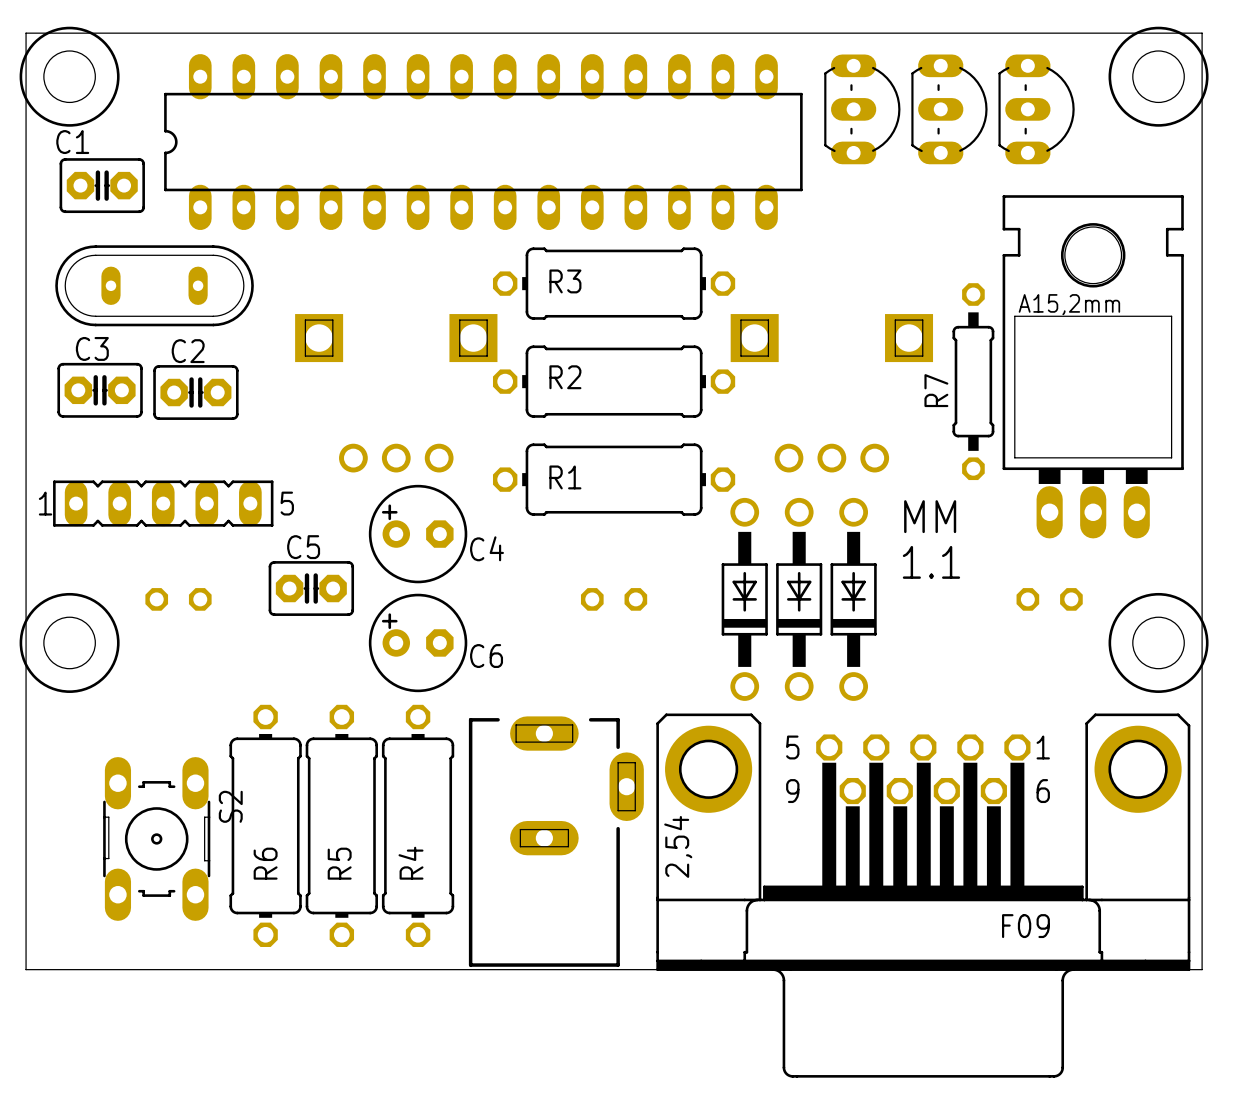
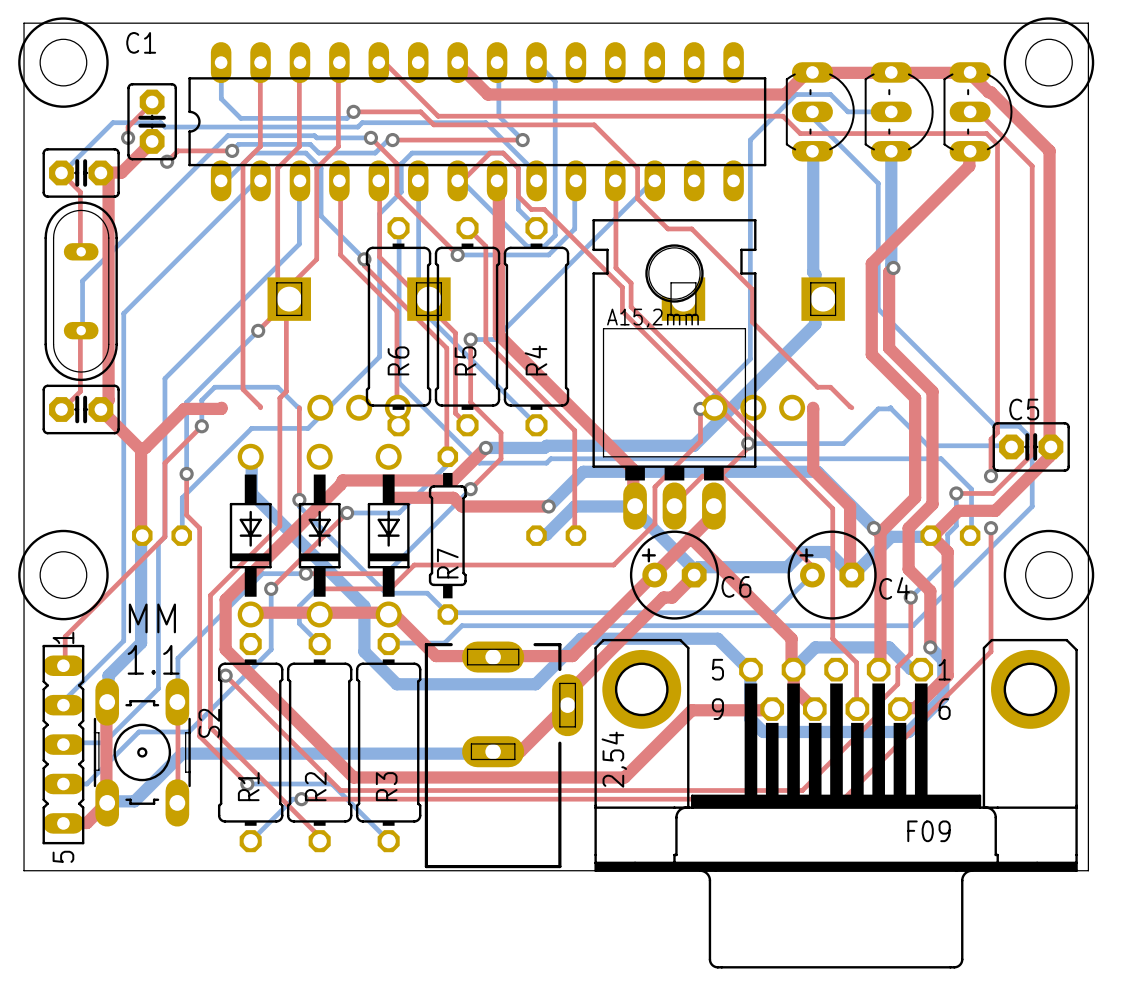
bottom track: none -> (221, 62) (221, 98) (240, 118) (347, 118) (353, 111)
top track: none -> (260, 62) (260, 146) (243, 163) (243, 389) (260, 407)
top track: none -> (299, 62) (299, 146) (277, 168) (277, 311) (258, 330)
top track: none -> (339, 62) (338, 146) (316, 168) (316, 259) (286, 289) (286, 391) (279, 398) (279, 525) (210, 595) (210, 727) (318, 836) (319, 841)
top track: none -> (378, 62) (386, 64) (438, 116) (782, 116) (800, 133) (986, 133) (997, 144) (997, 432) (991, 439) (991, 476)
top track: none -> (457, 62) (488, 94) (785, 94) (806, 72) (970, 72) (1049, 150) (1049, 456) (995, 510) (958, 510) (936, 532) (930, 535) (947, 552) (947, 675) (915, 708) (899, 709)
bottom track: none -> (497, 62) (498, 64) (498, 116) (522, 140)
bottom track: none -> (536, 62) (555, 81) (555, 235) (544, 246) (527, 246) (461, 181) (457, 180)
part: (862, 109) -> none
part: (949, 109) -> none
part: (1036, 109) -> none
top track: none -> (152, 102) (128, 127) (128, 137)
top track: none -> (353, 111) (420, 111) (433, 124) (594, 124) (637, 168) (637, 198) (667, 228) (691, 228) (752, 289) (752, 322) (817, 387) (830, 387) (851, 407)
via: none -> (353, 111)
bottom track: none -> (812, 111) (813, 118) (878, 183) (878, 309) (995, 426) (1019, 426) (1032, 439) (1032, 506) (912, 625) (461, 625) (444, 643) (388, 644)
part: none -> (820, 111)
bottom track: none -> (891, 111) (847, 111) (830, 94) (795, 94) (750, 140) (750, 359) (700, 408)
part: none -> (899, 111)
top track: none -> (970, 111) (978, 111) (1032, 166) (1032, 454) (993, 493) (956, 493)
part: none -> (978, 111)
C1 name position: C1 (72, 142) -> C1 (141, 42)
part position: (483, 142) -> (477, 121)
via: none -> (128, 137)
top track: none -> (370, 137) (396, 163) (396, 194) (457, 254)
bottom track: none -> (370, 137) (227, 135) (82, 280) (81, 330)
via: none -> (370, 137)
top track: none -> (392, 140) (522, 140)
bottom track: none -> (392, 140) (388, 140) (375, 153) (318, 153) (310, 144) (238, 144) (232, 150)
via: none -> (392, 140)
via: none -> (522, 140)
top track: none -> (152, 141) (121, 172) (100, 172) (108, 176) (108, 400) (100, 409) (141, 450)
top track: none -> (232, 150) (177, 150) (167, 161)
via: none -> (232, 150)
bottom track: none -> (812, 151) (815, 324) (693, 445) (546, 445) (544, 447) (485, 447)
bottom track: none -> (891, 151) (891, 265) (893, 267)
top track: none -> (970, 151) (969, 166) (871, 263) (871, 354) (915, 398) (915, 497) (880, 532)
C1 rotation: 0° (102, 185) -> 90° clockwise (152, 121)
C1 position: (102, 185) -> (152, 121)
via: none -> (167, 161)
top track: none -> (61, 172) (80, 192) (81, 251)
bottom track: none -> (61, 172) (112, 122) (160, 122) (164, 127) (357, 127) (362, 122) (485, 122) (535, 172) (536, 180)
part: none -> (81, 172)
bottom track: none -> (221, 180) (221, 179) (227, 179) (253, 153) (305, 153) (321, 168) (321, 215) (364, 259)
bottom track: none -> (260, 180) (256, 181) (123, 313) (123, 640) (65, 699) (63, 705)
bottom track: none -> (299, 180) (299, 244) (164, 378) (164, 536) (158, 543) (158, 688) (104, 742) (65, 742) (63, 744)
top track: none -> (339, 180) (340, 254) (396, 311) (396, 424) (398, 425)
top track: none -> (378, 180) (379, 257) (455, 333) (455, 413) (467, 425)
bottom track: none -> (418, 180) (418, 307) (536, 425)
top track: none -> (457, 180) (457, 179) (464, 179) (490, 153) (503, 153) (518, 168) (518, 196) (531, 209) (544, 209) (622, 287) (622, 311) (748, 437) (748, 447) (722, 476)
top track: none -> (497, 180) (498, 181) (498, 335) (633, 469) (633, 504) (635, 506)
bottom track: none -> (575, 180) (574, 228) (548, 254) (457, 254)
top track: none -> (615, 180) (615, 267) (631, 283) (631, 307) (832, 508) (832, 638) (856, 662) (857, 709)
bottom track: none -> (654, 180) (494, 339) (470, 339)
bottom track: none -> (398, 228) (399, 382) (479, 463) (546, 463) (550, 458) (941, 458) (971, 489) (970, 535)
top track: none -> (467, 228) (485, 246) (485, 341) (574, 430) (575, 535)
bottom track: none -> (536, 228) (518, 209) (518, 168) (503, 153) (412, 153) (401, 163) (401, 192) (379, 213) (379, 356) (308, 428) (251, 428) (182, 497) (181, 535)
R3 name position: R3 (565, 281) -> R3 (386, 786)
R3 rotation: 0° (614, 283) -> 90° clockwise (388, 742)
R3 position: (614, 283) -> (388, 742)
part rotation: 0° (154, 285) -> 90° clockwise (81, 291)
via: none -> (457, 254)
top track: none -> (364, 259) (364, 265) (446, 348) (447, 456)
via: none -> (364, 259)
top track: none -> (893, 267) (889, 272) (889, 348) (932, 391) (932, 504) (908, 528) (908, 569) (930, 591) (930, 647)
via: none -> (893, 267)
part position: (1093, 366) -> (674, 374)
top track: none -> (81, 330) (80, 391) (61, 409)
bottom track: none -> (258, 330) (186, 402) (186, 473)
via: none -> (258, 330)
R2 name position: R2 (565, 377) -> R2 (315, 786)
R2 rotation: 0° (614, 381) -> 90° clockwise (319, 742)
R2 position: (614, 381) -> (319, 742)
R7 position: (973, 381) -> (447, 535)
top track: none -> (470, 339) (470, 402) (501, 432) (501, 458) (470, 489)
via: none -> (470, 339)
C3: (100, 390) -> none
R7 name position: R7 (936, 390) -> R7 (447, 563)
C2: (195, 392) -> none
top track: none -> (221, 407) (184, 408) (141, 450)
top track: none -> (299, 407) (299, 499)
bottom track: none -> (299, 407) (277, 387) (214, 387) (201, 400) (201, 426)
top track: none -> (813, 407) (813, 469) (850, 506) (850, 573) (851, 575)
top track: none -> (700, 408) (700, 441) (654, 486) (654, 523) (613, 565) (414, 565) (390, 588) (316, 588)
via: none -> (700, 408)
part: none -> (81, 409)
R1 name position: R1 (565, 477) -> R1 (248, 786)
top track: none -> (201, 426) (164, 463) (164, 536) (65, 636) (65, 664) (63, 665)
via: none -> (201, 426)
R1 rotation: 0° (614, 479) -> 90° clockwise (250, 742)
R1 position: (614, 479) -> (250, 742)
bottom track: none -> (748, 443) (843, 443) (878, 408) (890, 407) (928, 445) (1011, 446)
via: none -> (748, 443)
top track: none -> (485, 447) (453, 480) (342, 480) (225, 599) (225, 649) (353, 777) (624, 777) (691, 710) (772, 709)
via: none -> (485, 447)
part: (163, 503) -> none
top track: none -> (141, 450) (142, 535)
bottom track: none -> (250, 456) (251, 493) (364, 606) (364, 651) (396, 684) (535, 684) (581, 638) (717, 638) (750, 669) (750, 718) (763, 731) (908, 731) (943, 697) (943, 660) (930, 647)
bottom track: none -> (447, 456) (446, 465) (399, 512) (347, 512)
text: MM (930, 516) -> none
top track: none -> (186, 473) (186, 515) (199, 528) (199, 736) (247, 784)
via: none -> (186, 473)
top track: none -> (722, 476) (702, 476) (674, 506)
top track: none -> (722, 476) (811, 565) (812, 575)
via: none -> (991, 476)
C4 position: (418, 534) -> (832, 575)
bottom track: none -> (470, 489) (386, 573)
via: none -> (470, 489)
bottom track: none -> (956, 493) (956, 525) (947, 534) (947, 560) (910, 597)
via: none -> (956, 493)
top track: none -> (394, 497) (453, 497) (461, 506) (548, 506)
bottom track: none -> (299, 499) (299, 506) (386, 593) (427, 593) (447, 614) (448, 612) (774, 612) (812, 575)
via: none -> (299, 499)
text: 1.1 (931, 562) -> none
top track: none -> (713, 506) (713, 515) (572, 656) (435, 656) (394, 614) (388, 614) (388, 612) (325, 612) (319, 614) (318, 612) (251, 612) (250, 614)
bottom track: none -> (548, 506) (583, 471) (817, 471) (873, 528)
via: none -> (548, 506)
top track: none -> (347, 512) (271, 588)
via: none -> (347, 512)
C5 position: (311, 588) -> (1031, 446)
via: none -> (873, 528)
top track: none -> (991, 528) (991, 651) (843, 799) (301, 799)
via: none -> (991, 528)
top track: none -> (880, 532) (880, 669) (878, 669)
bottom track: none -> (142, 535) (141, 643) (108, 675) (107, 702)
part: none -> (250, 535)
part: none -> (319, 535)
part: none -> (388, 535)
bottom track: none -> (536, 535) (546, 534) (574, 506) (635, 506) (635, 510) (693, 569) (694, 575) (698, 567) (787, 567) (802, 552) (828, 552) (852, 575) (891, 536) (930, 535)
part: (744, 599) -> none
part: (799, 599) -> none
part: (853, 599) -> none
top track: none -> (690, 537) (791, 638) (793, 688) (814, 709)
top track: none -> (305, 573) (386, 573)
bottom track: none -> (305, 573) (262, 573) (177, 658) (177, 702)
via: none -> (305, 573)
C6 position: (418, 642) -> (674, 575)
top track: none -> (694, 575) (672, 597) (663, 597) (568, 692) (567, 705) (520, 751) (493, 751)
bottom track: none -> (271, 588) (271, 649) (188, 731) (138, 731) (86, 784) (63, 784)
via: none -> (271, 588)
bottom track: none -> (316, 588) (299, 606) (299, 623) (319, 644)
top track: none -> (910, 597) (910, 653) (897, 666) (897, 684) (876, 705) (876, 716) (802, 790) (340, 790) (225, 675)
via: none -> (910, 597)
text: none -> MM (152, 618)
via: none -> (930, 647)
text: none -> 1.1 (153, 659)
bottom track: none -> (793, 669) (815, 647) (889, 647) (910, 669) (921, 669)
via: none -> (225, 675)
top track: none -> (107, 702) (107, 802) (86, 823) (63, 823)
top track: none -> (177, 702) (177, 802)
R6 position: (265, 825) -> (398, 326)
R5 position: (341, 825) -> (467, 326)
R4 position: (418, 825) -> (536, 326)
part: none -> (63, 744)
bottom track: none -> (493, 751) (492, 753) (182, 753) (134, 801) (107, 802)
R4 name position: R4 (411, 863) -> R4 (536, 360)
bottom track: none -> (247, 784) (331, 784) (388, 841)
via: none -> (247, 784)
bottom track: none -> (301, 799) (292, 799) (250, 841)
via: none -> (301, 799)

